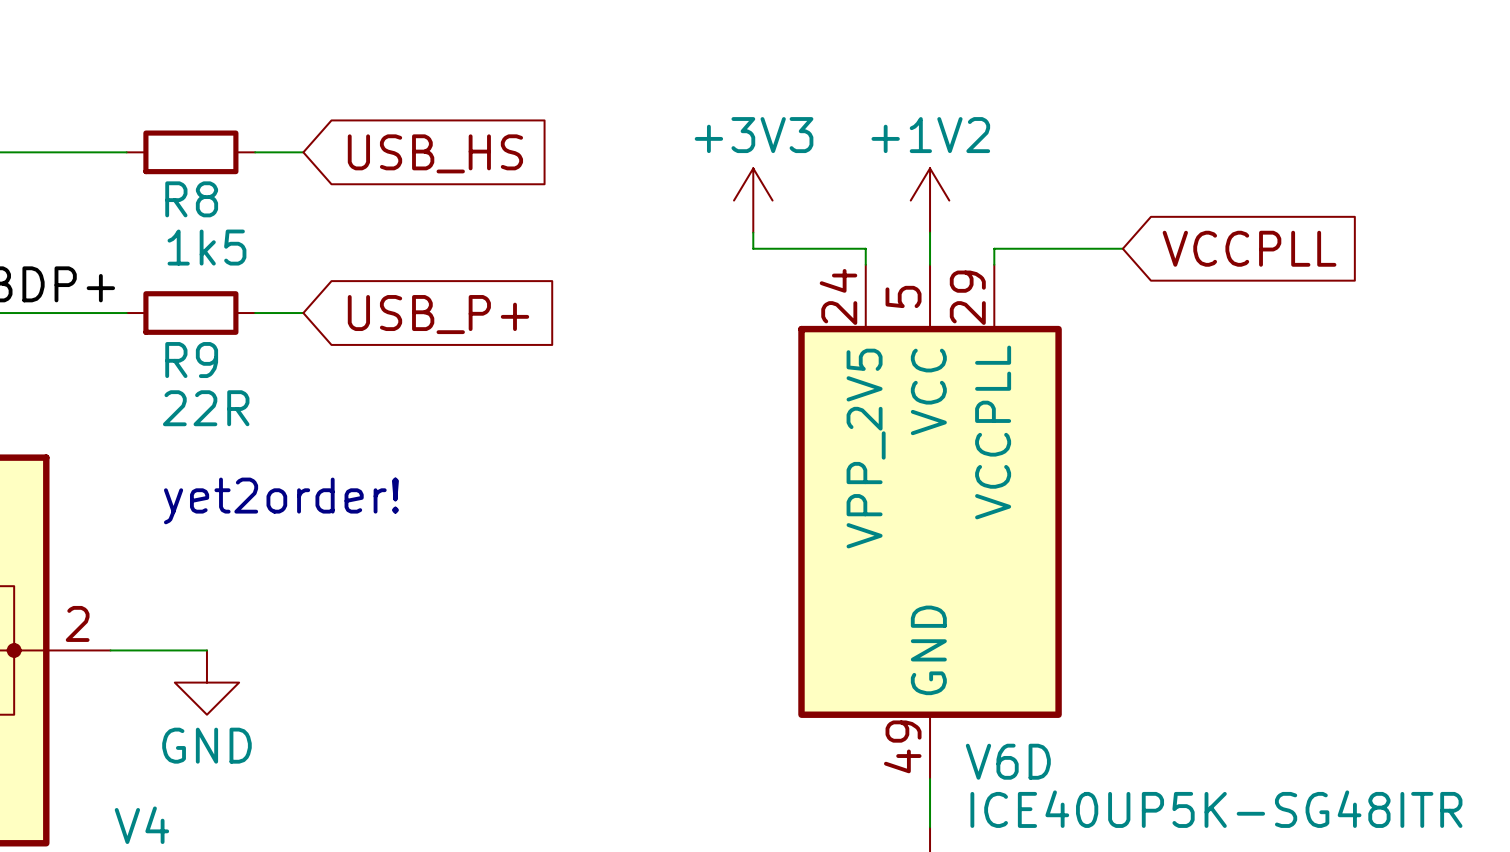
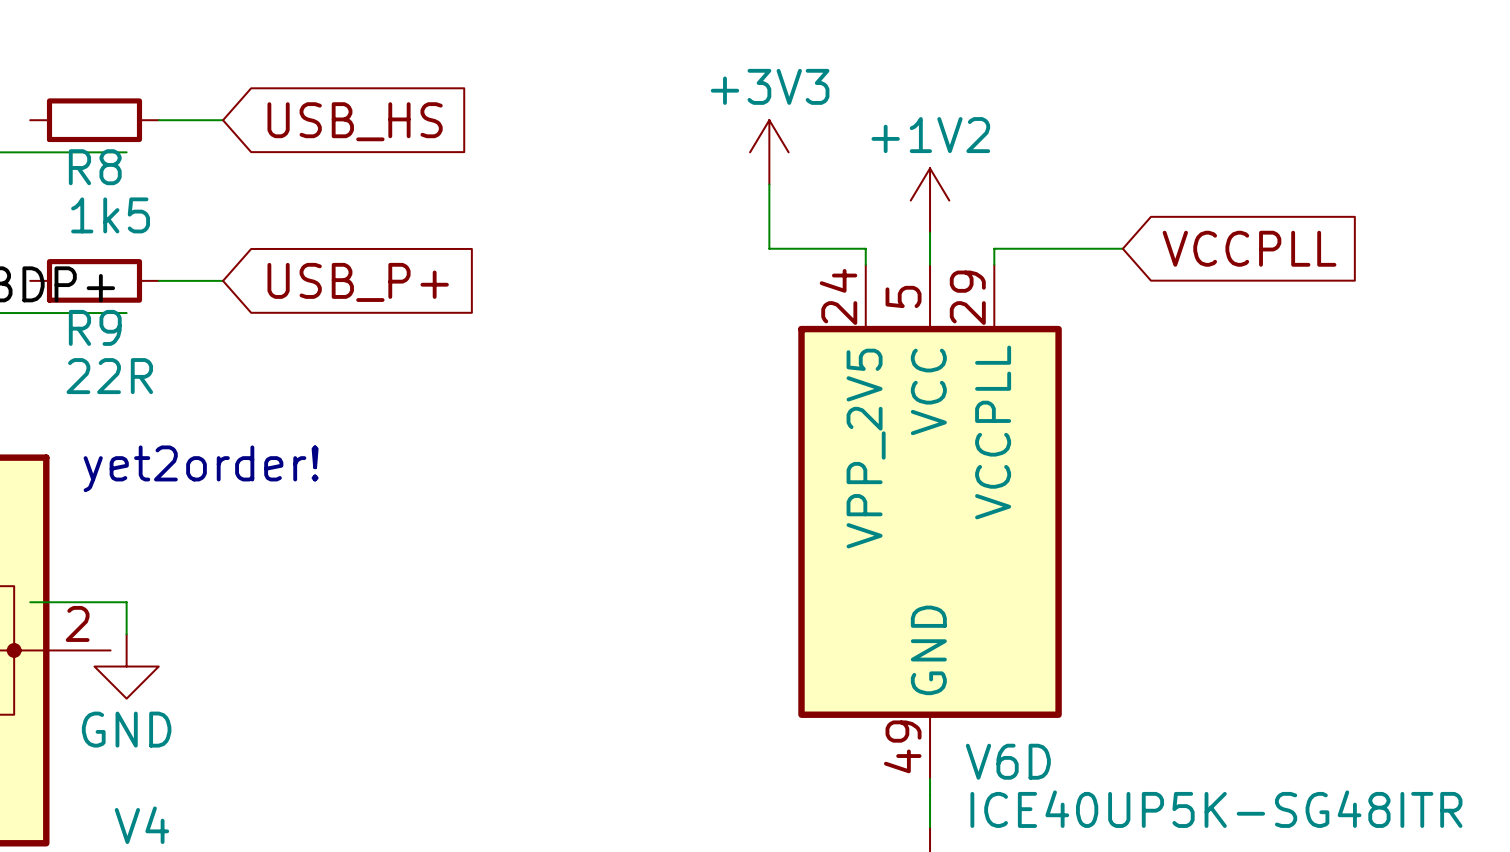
wire: none -> (158, 120) (223, 120)
R8 position: (190, 152) -> (94, 120)
global label position: USB_HS (435, 153) -> USB_HS (355, 121)
power symbol position: +3V3 (753, 200) -> +3V3 (769, 152)
wire: (753, 232) (753, 248) (769, 248) -> (769, 184) (769, 248)
wire: none -> (158, 280) (223, 280)
R9 position: (190, 313) -> (94, 280)
global label position: USB_P+ (438, 314) -> USB_P+ (358, 282)
text position: yet2order! (281, 500) -> yet2order! (201, 468)
wire: none -> (30, 602) (126, 602) (126, 634)
wire: (110, 650) (206, 650) -> none
power symbol position: GND (206, 682) -> GND (126, 666)

